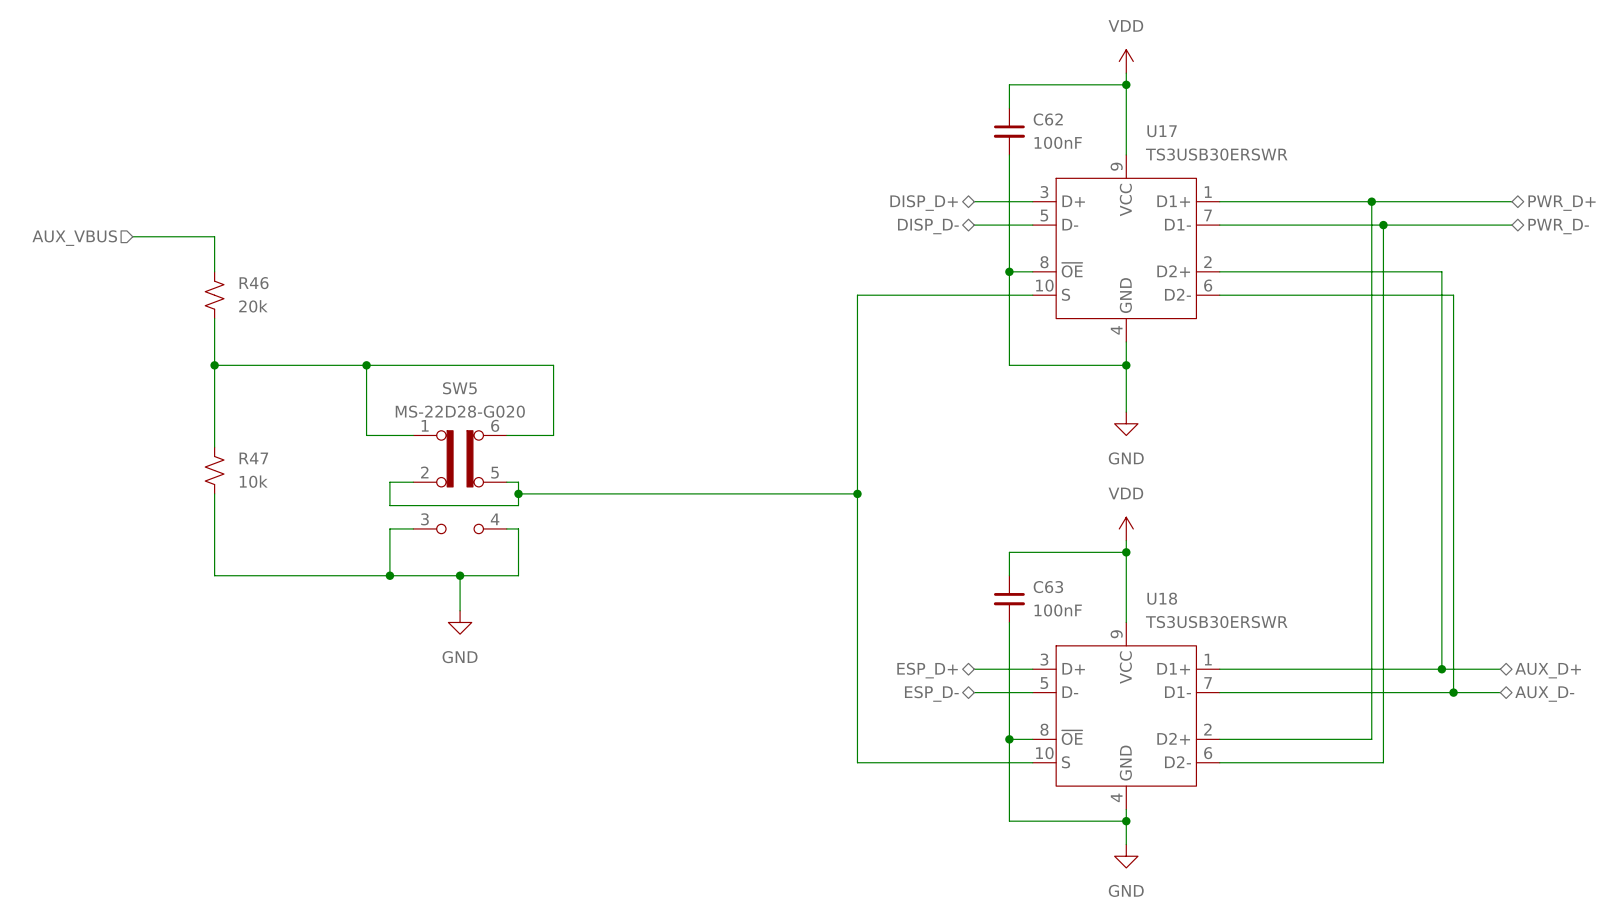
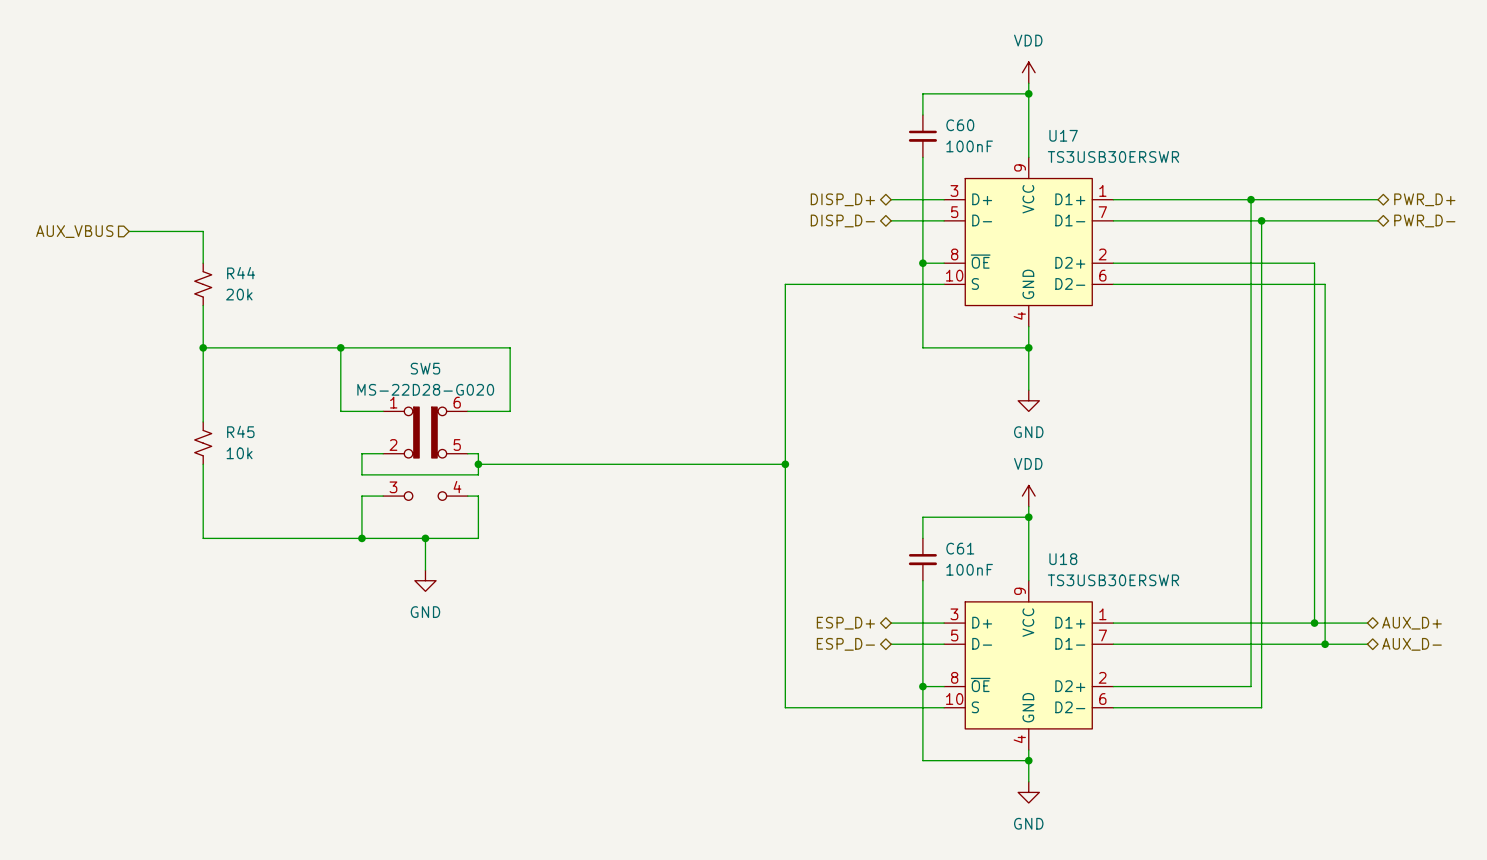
C62 name: C62 (1048, 119) -> C60 (960, 125)
R46 name: R46 (254, 283) -> R44 (241, 273)
R47 name: R47 (253, 458) -> R45 (240, 431)
C63 name: C63 (1048, 587) -> C61 (960, 548)

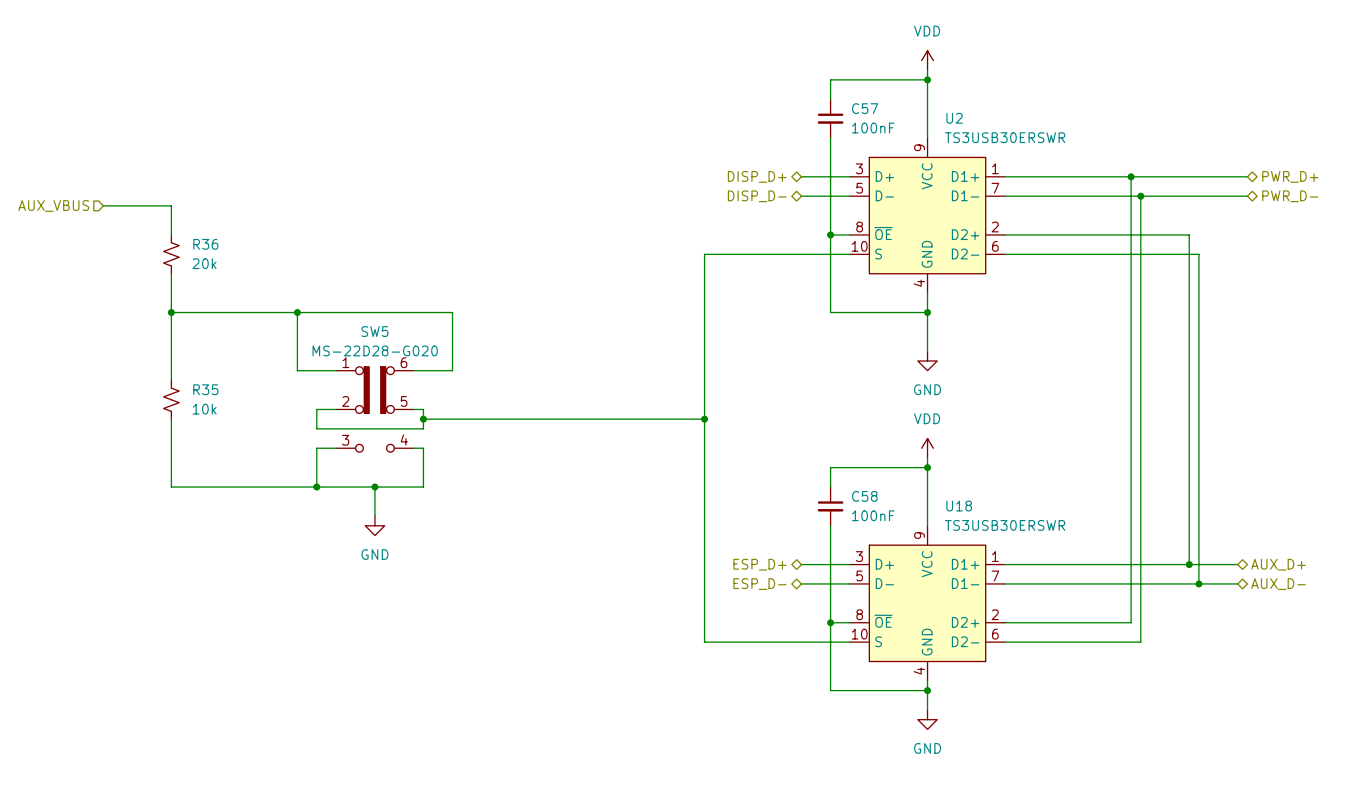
C60 name: C60 (960, 125) -> C57 (865, 108)
U17 name: U17 (1063, 135) -> U2 (954, 118)
R44 name: R44 (241, 273) -> R36 (205, 244)
R45 name: R45 (240, 431) -> R35 (205, 389)
C61 name: C61 (960, 548) -> C58 (864, 496)

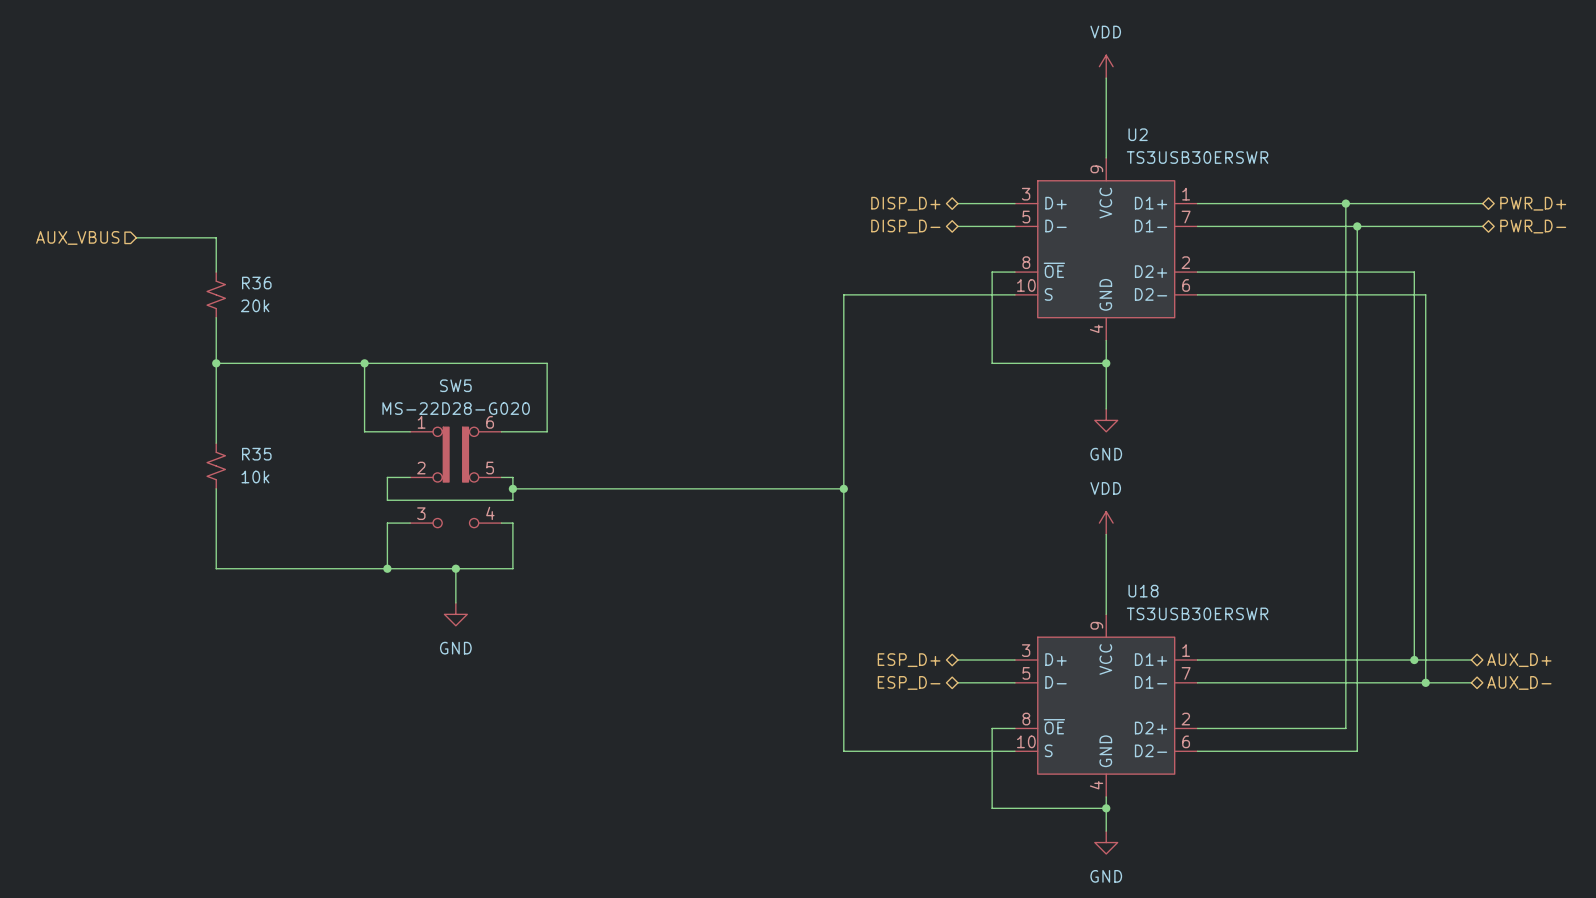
wire: (927, 79) (830, 79) (830, 99) -> none
junction: (927, 79) -> none
C57: 100nF (830, 118) -> none
wire: (830, 138) (830, 234) -> none
junction: (830, 234) -> none
wire: (927, 467) (830, 467) (830, 487) -> none
junction: (927, 467) -> none
C58: 100nF (830, 506) -> none
wire: (830, 525) (830, 622) -> none
junction: (830, 622) -> none

